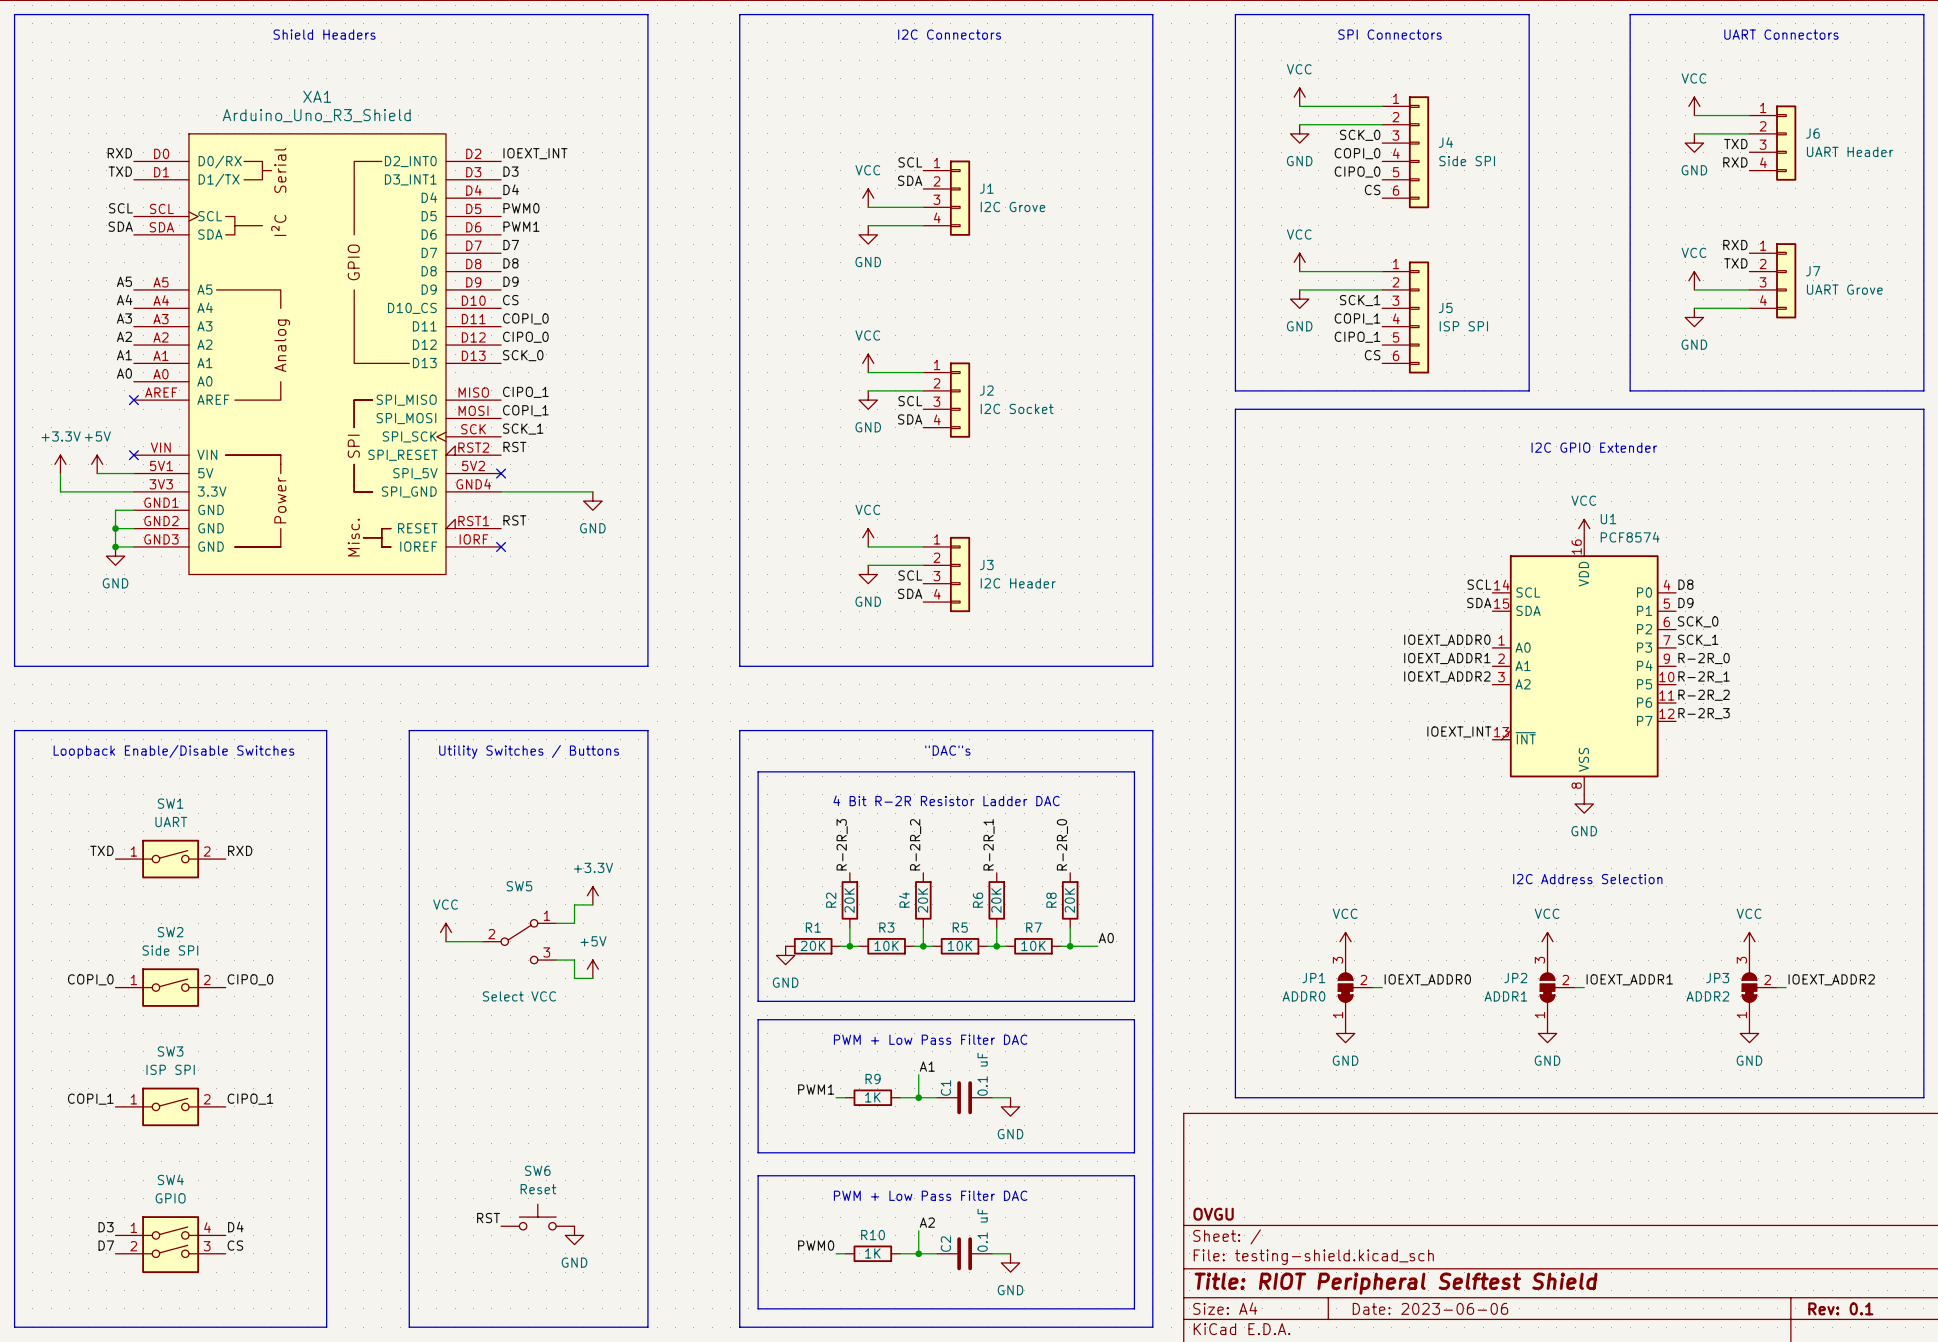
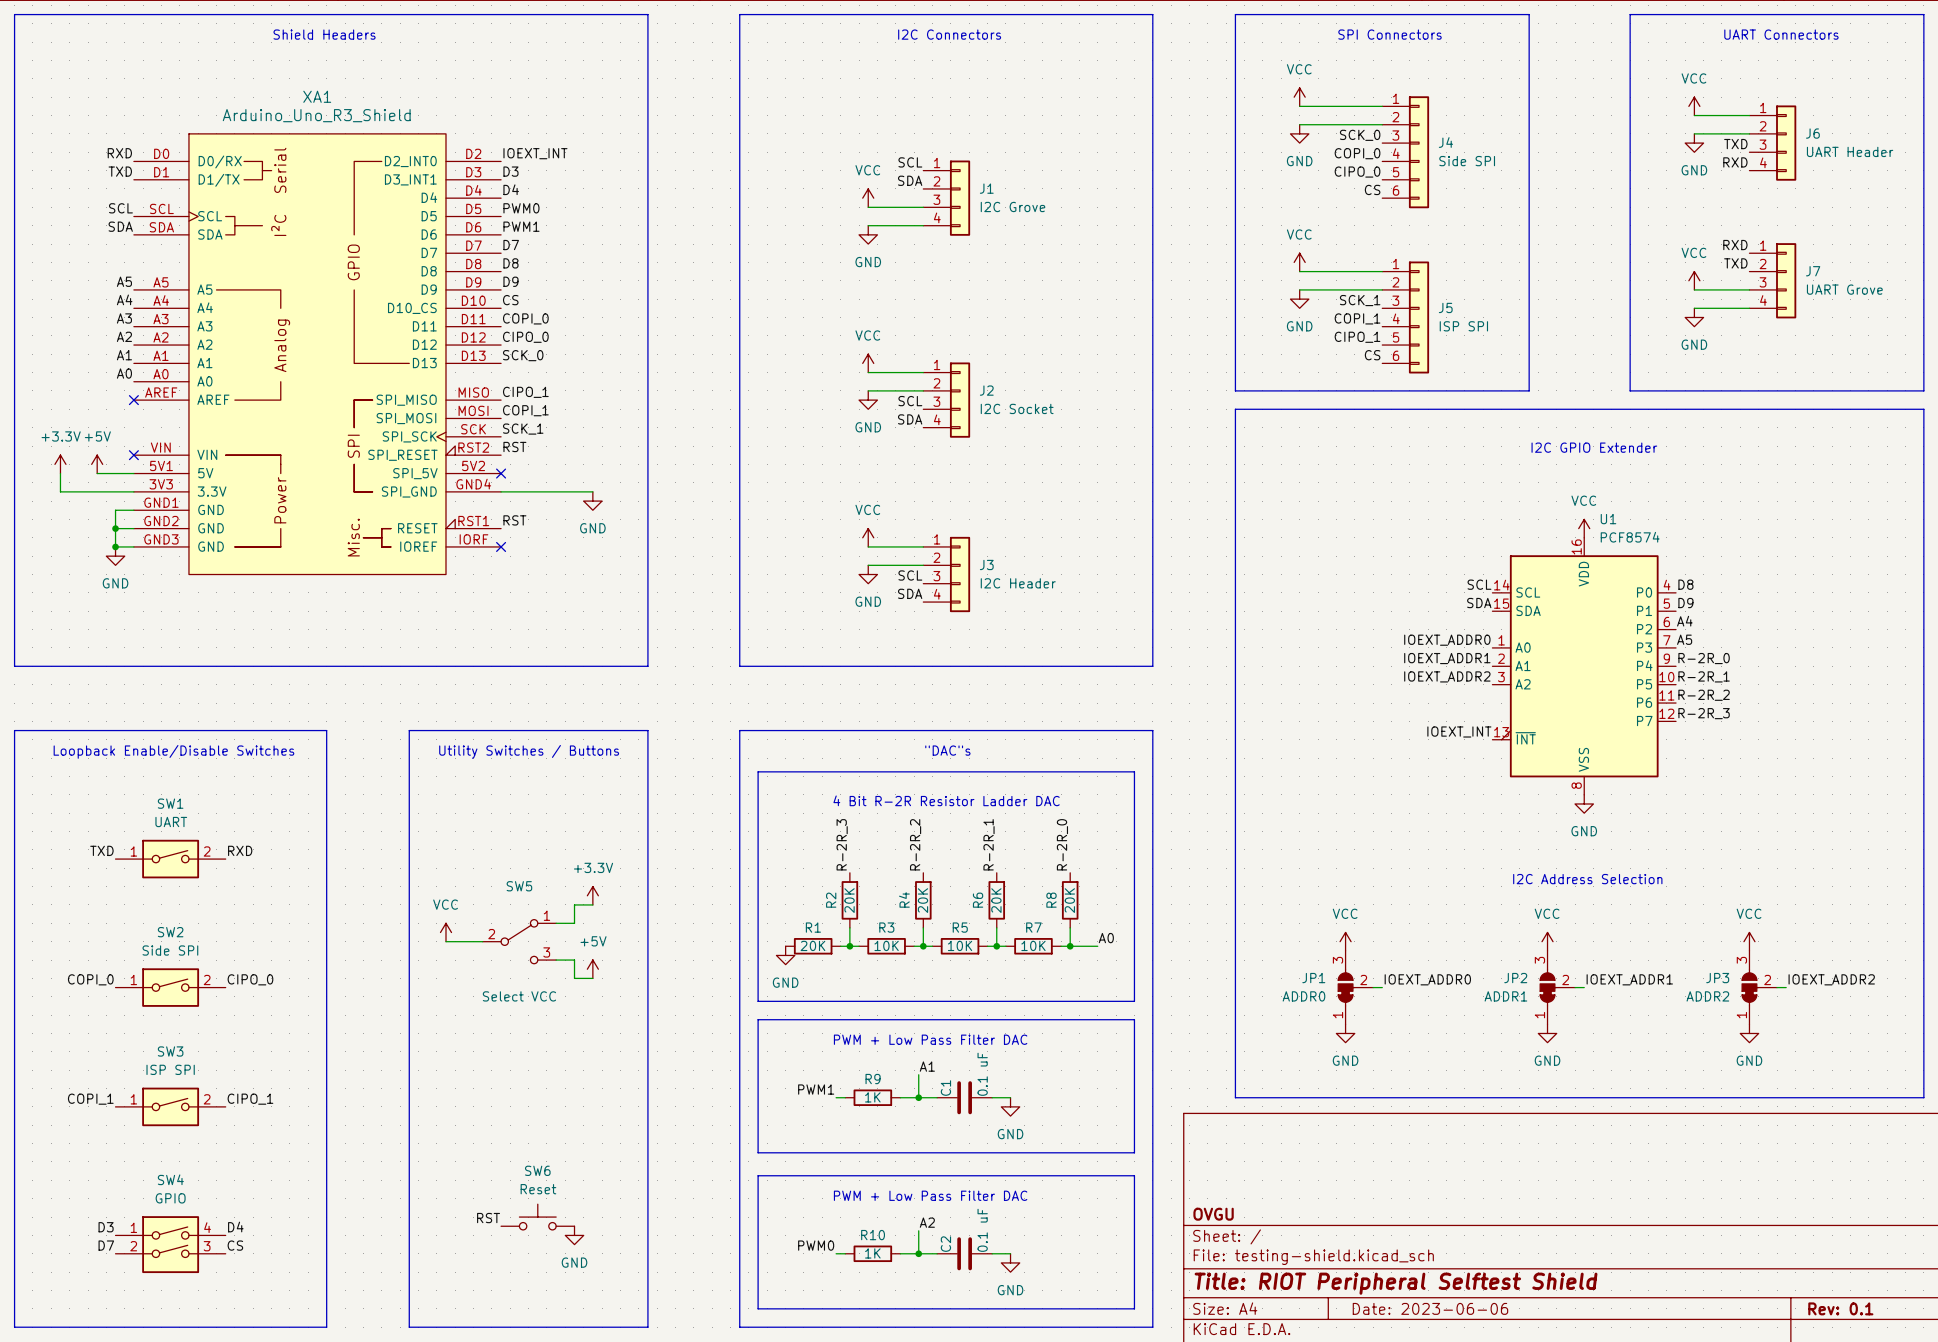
label: SCK_0 (1698, 621) -> A4 (1684, 621)
label: SCK_1 (1698, 640) -> A5 (1684, 639)

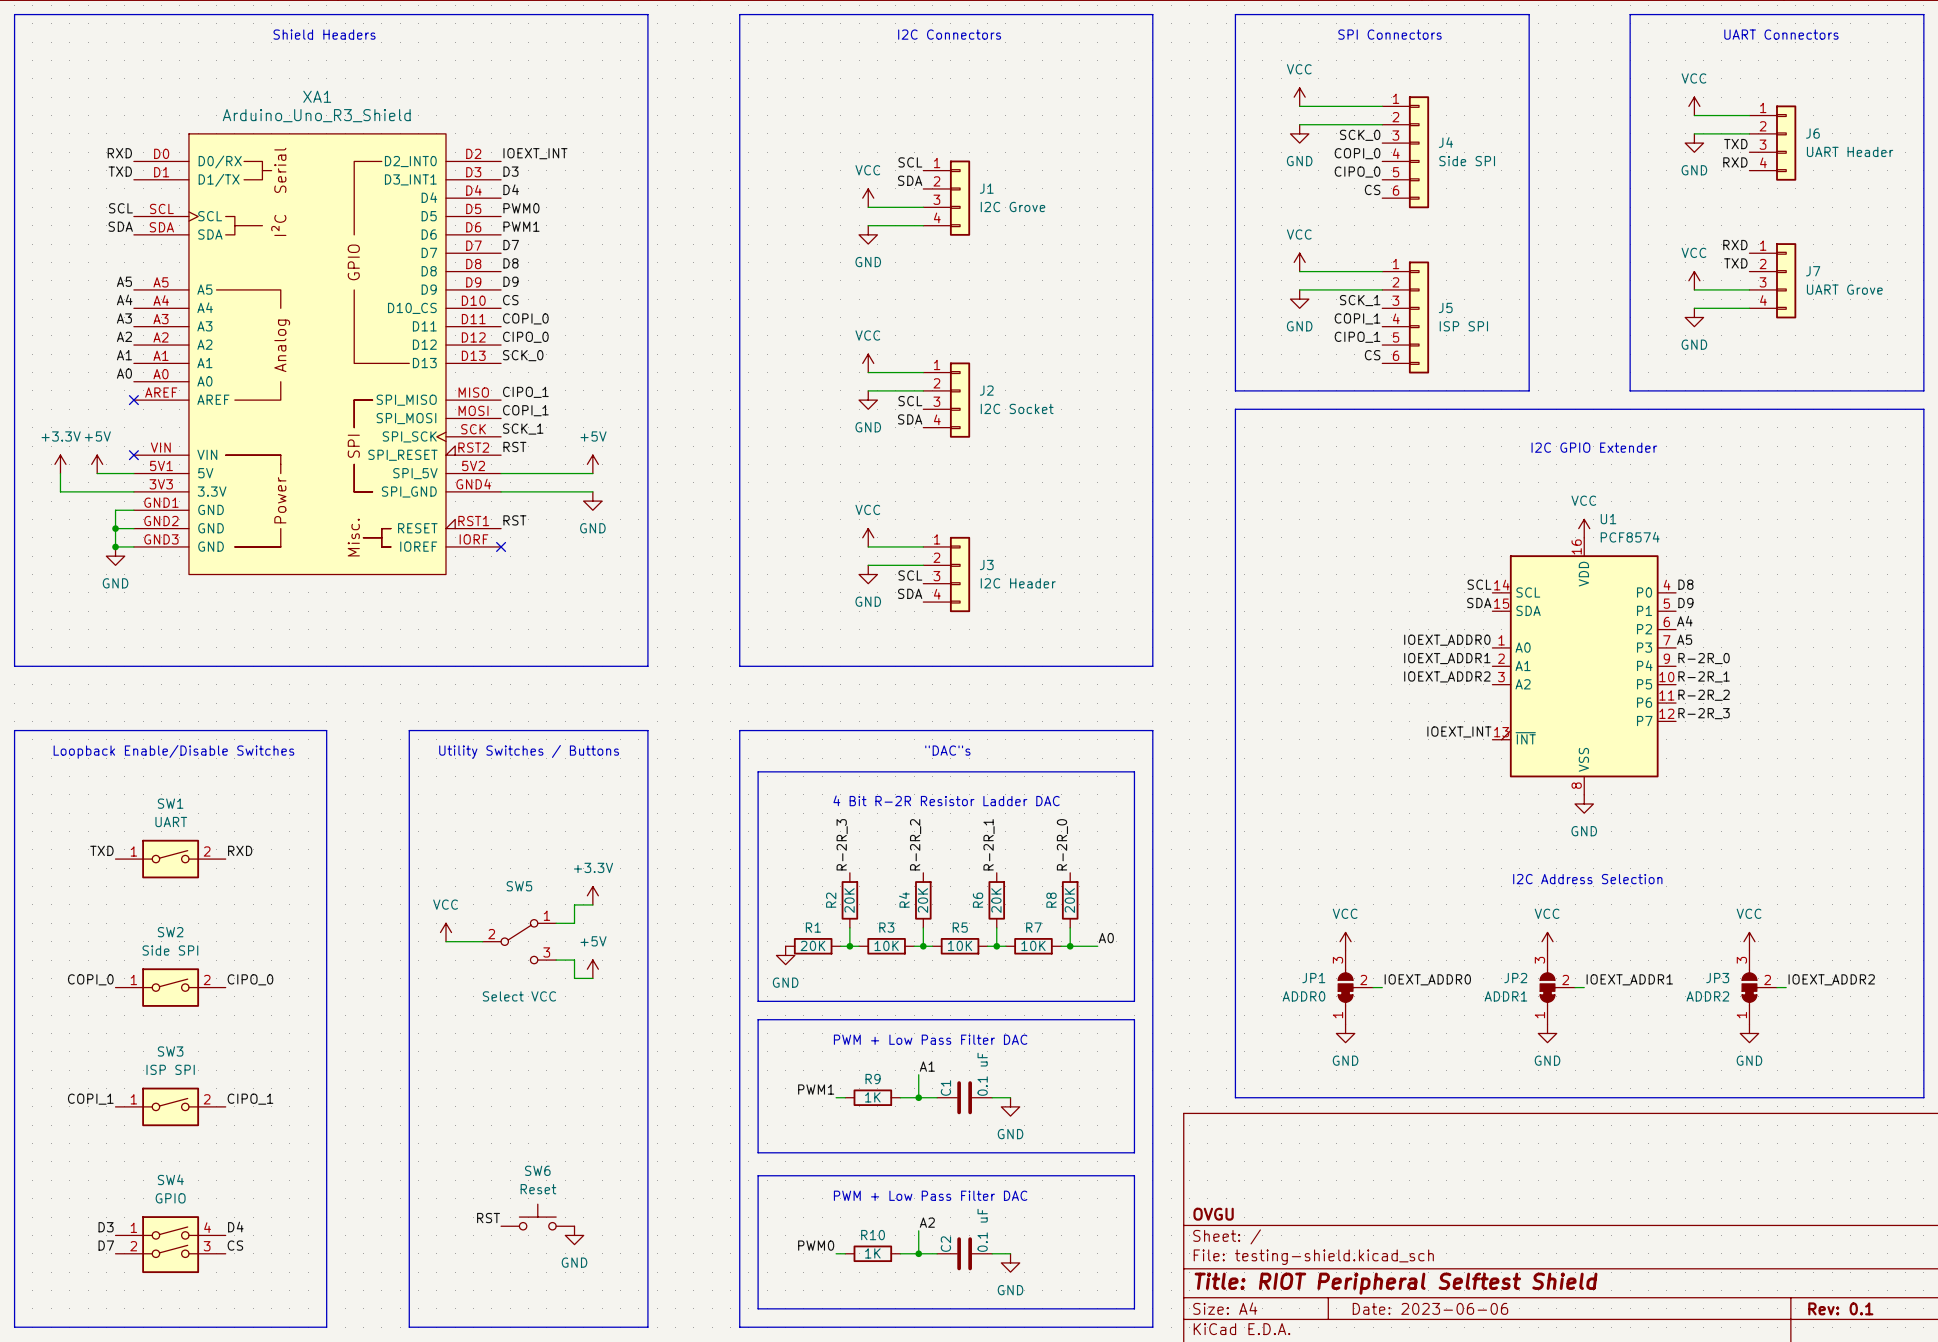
power symbol: none -> +5V (592, 464)
wire: none -> (501, 473) (592, 473)
no-connect mark: (501, 473) -> none

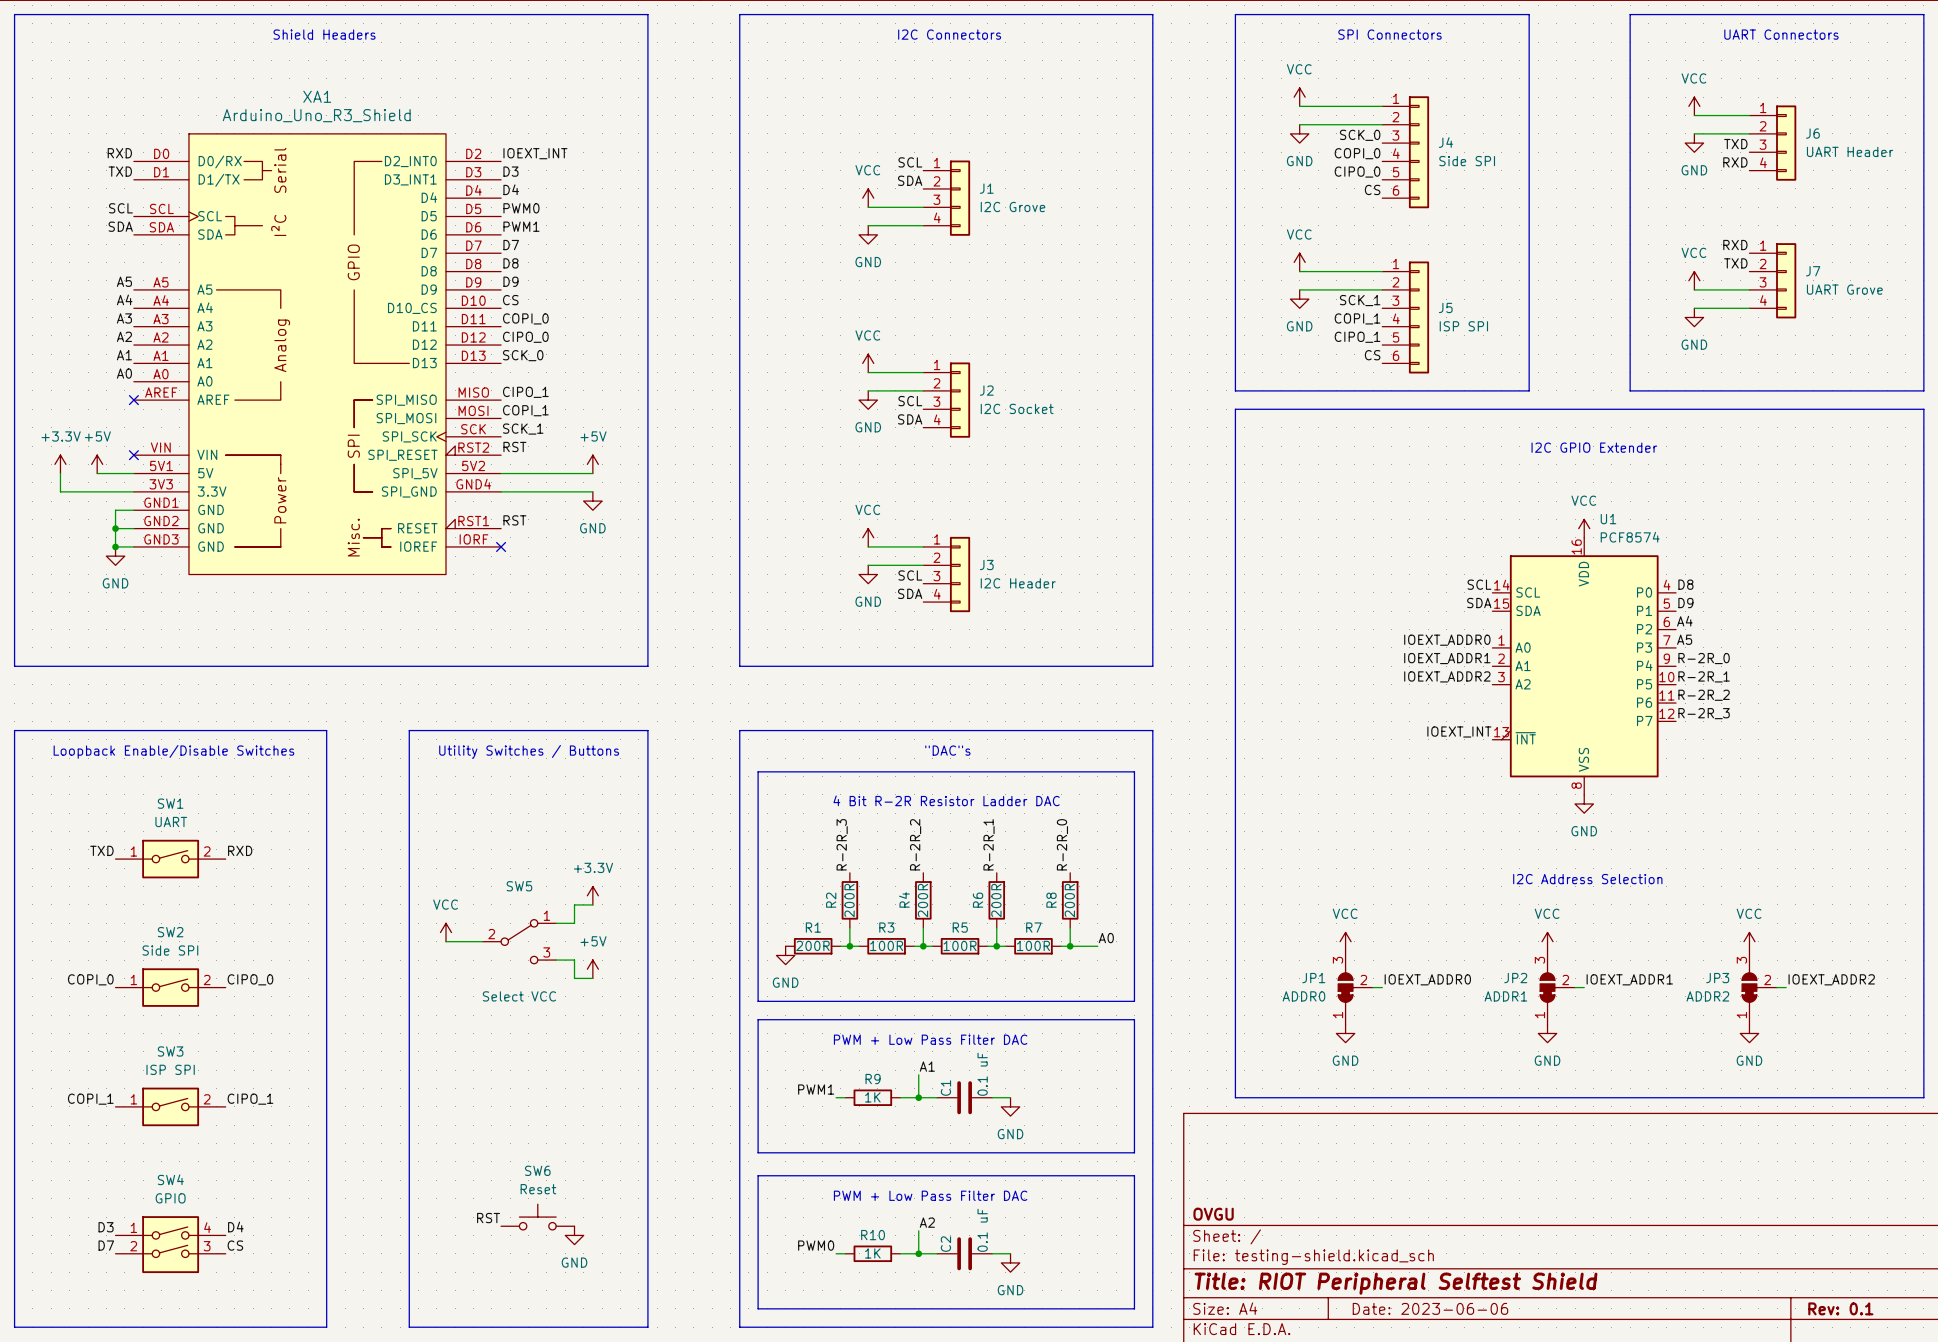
R2 value: 20K (849, 900) -> 200R (849, 900)
R4 value: 20K (922, 900) -> 200R (922, 900)
R6 value: 20K (996, 900) -> 200R (996, 900)
R8 value: 20K (1069, 900) -> 200R (1069, 900)
R1 value: 20K (812, 945) -> 200R (812, 945)
R3 value: 10K (886, 945) -> 100R (886, 945)
R5 value: 10K (960, 945) -> 100R (960, 945)
R7 value: 10K (1033, 945) -> 100R (1033, 945)

